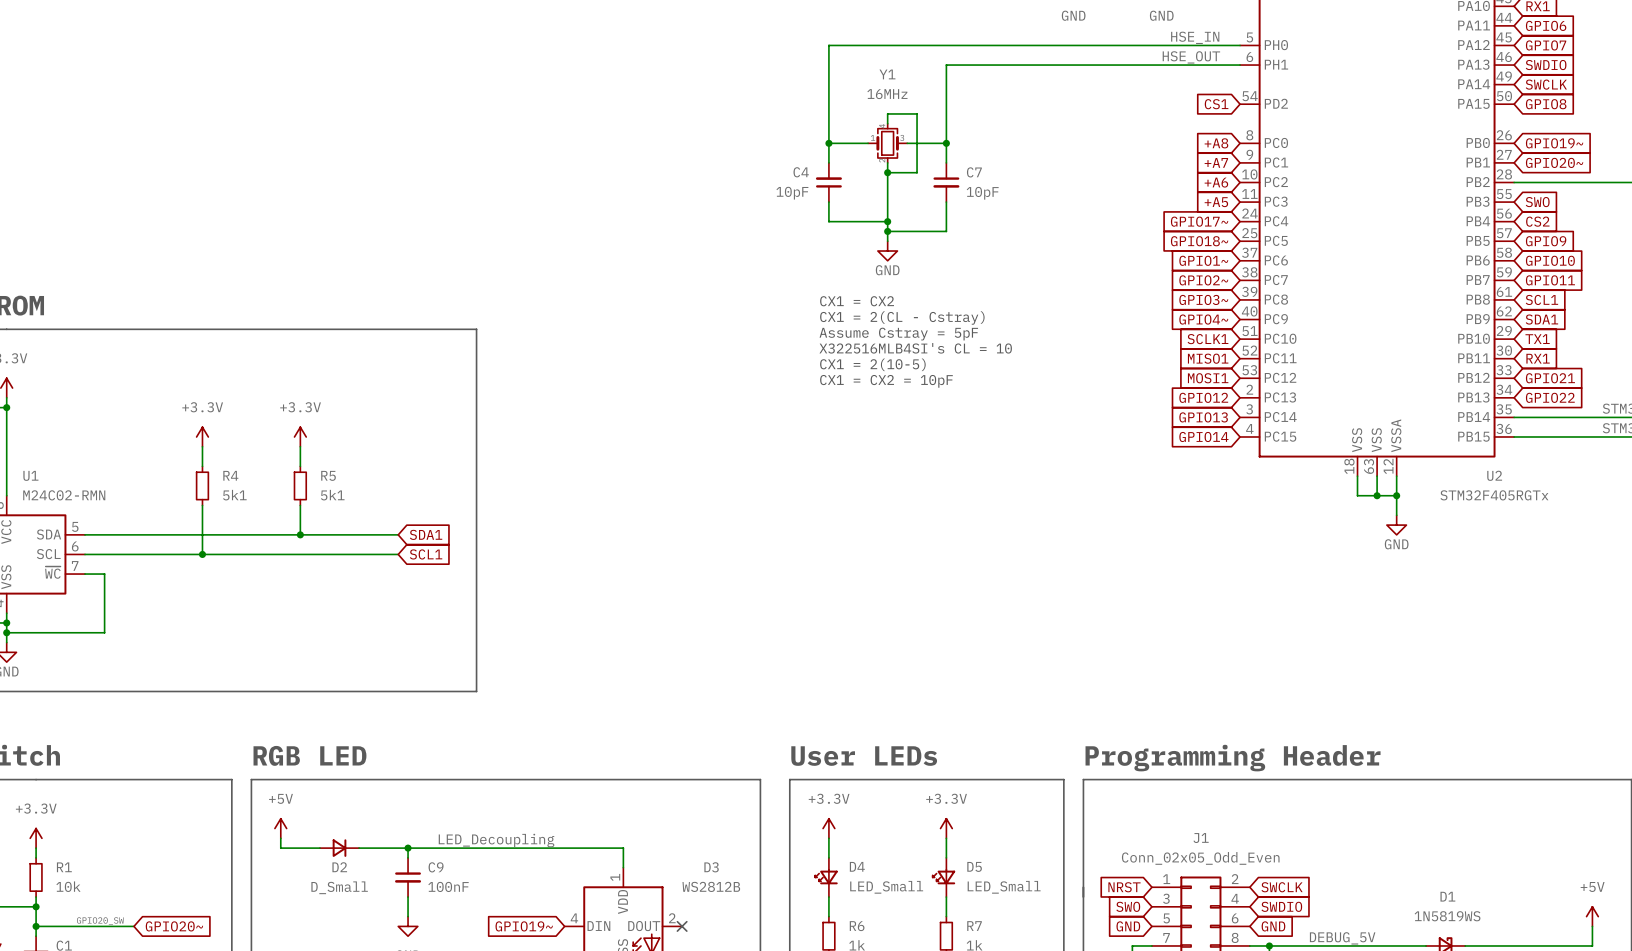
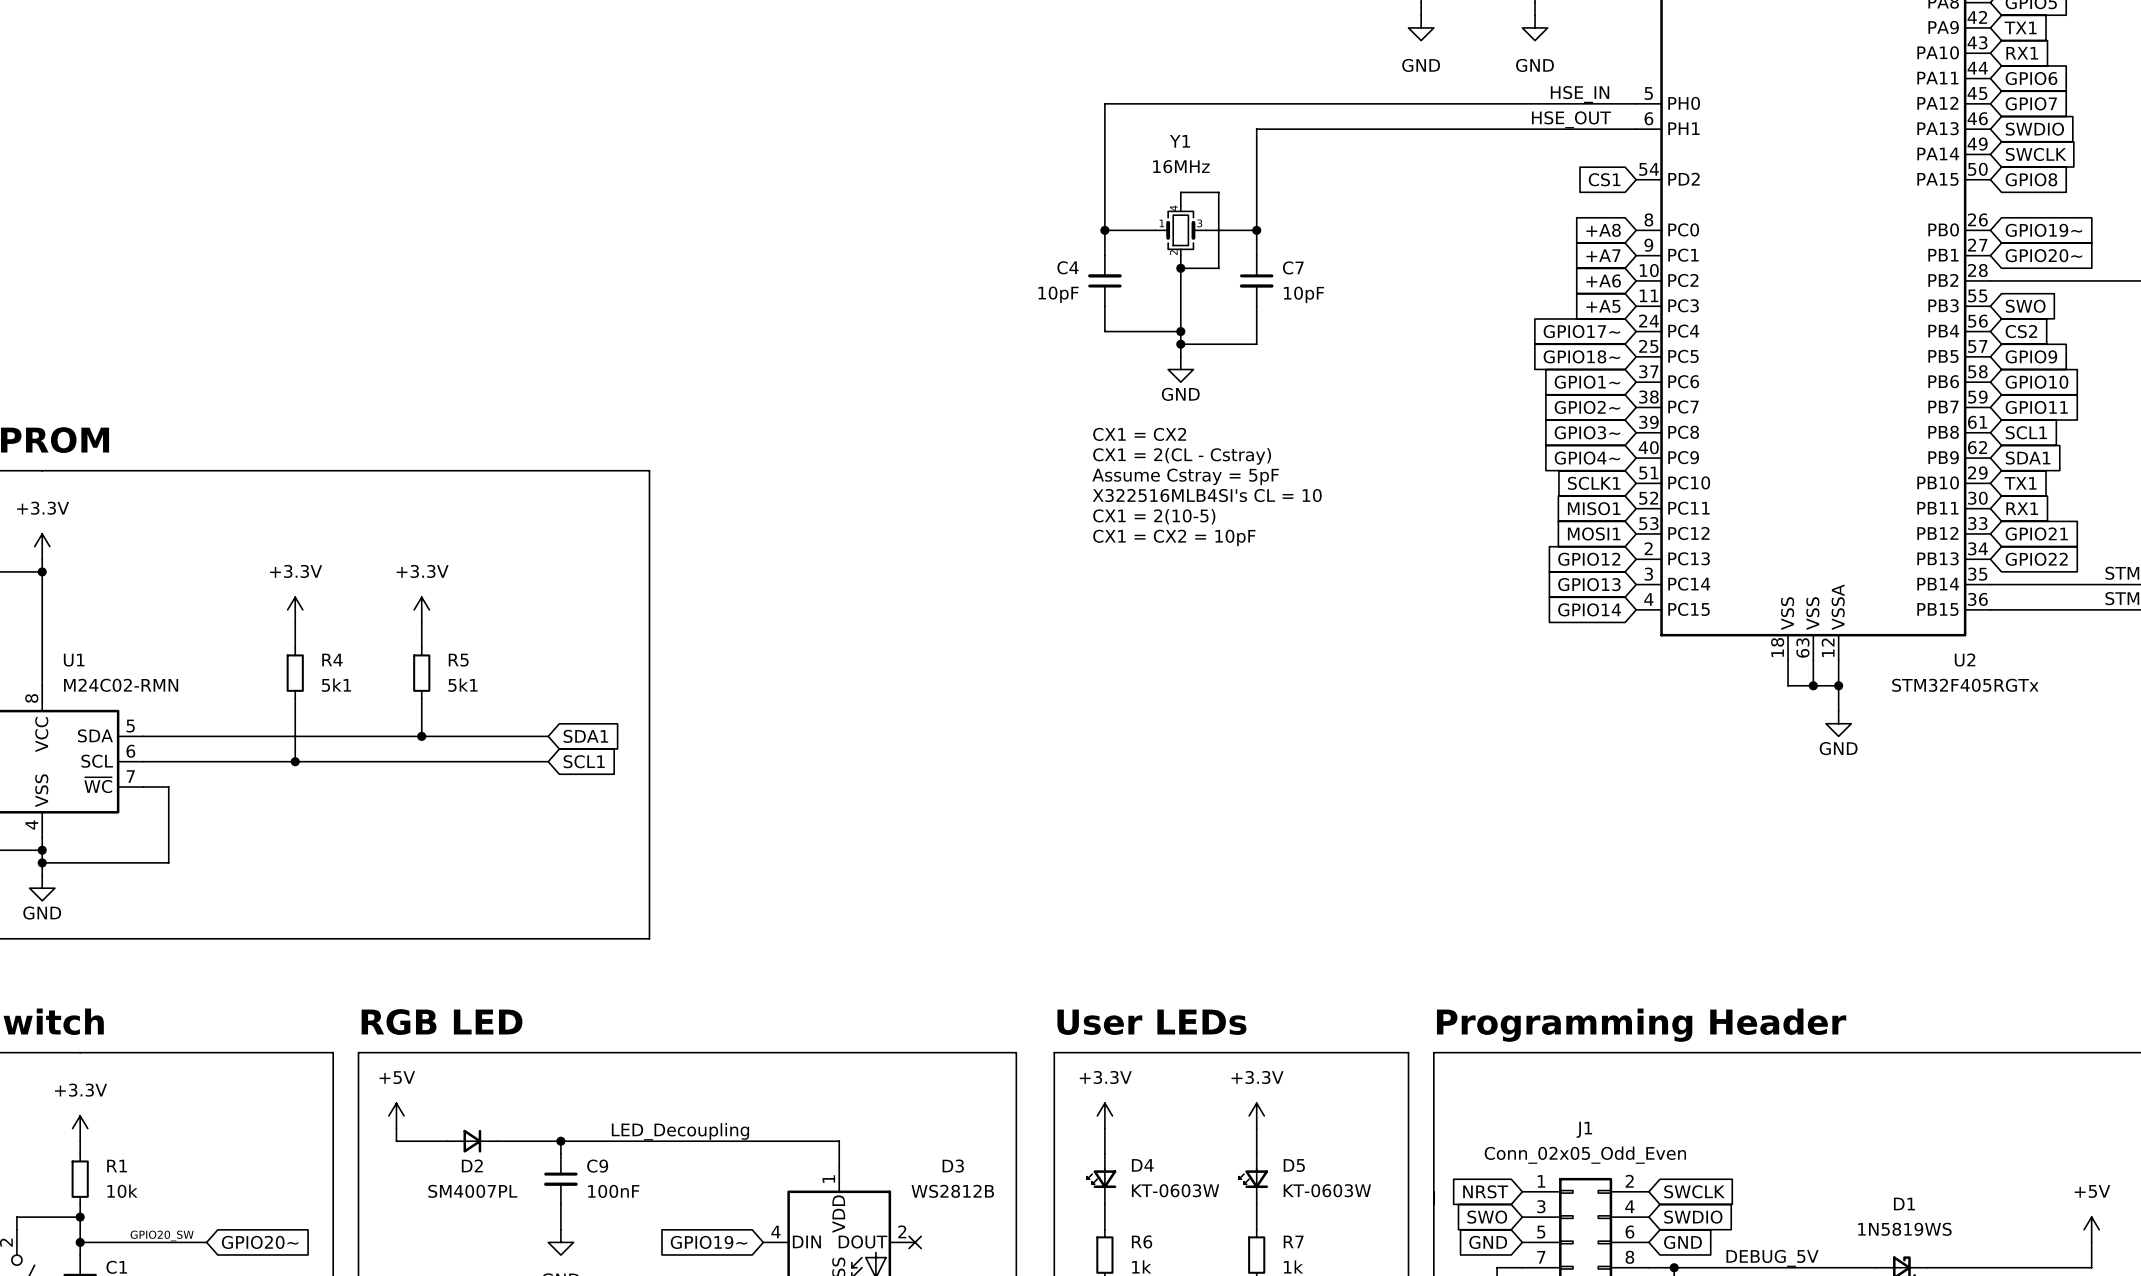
D2 value: D_Small (339, 887) -> SM4007PL (472, 1191)
D4 value: LED_Small (886, 887) -> KT-0603W (1175, 1190)
D5 value: LED_Small (1004, 887) -> KT-0603W (1327, 1190)

